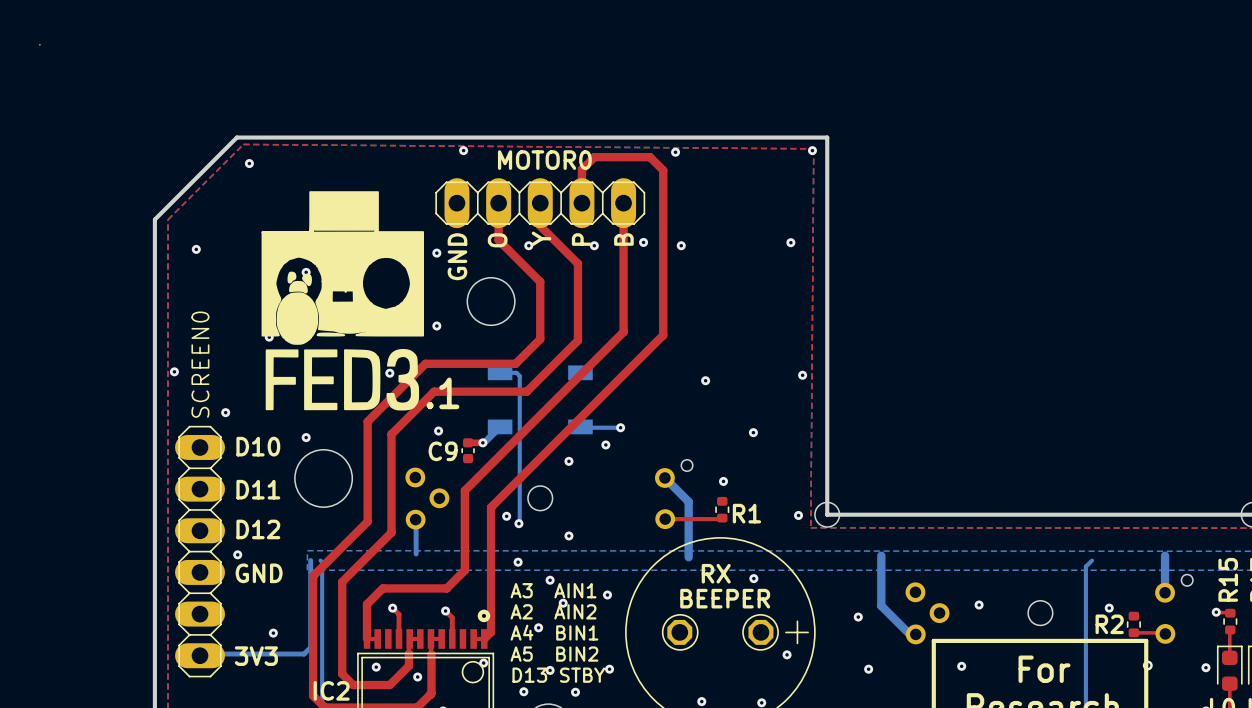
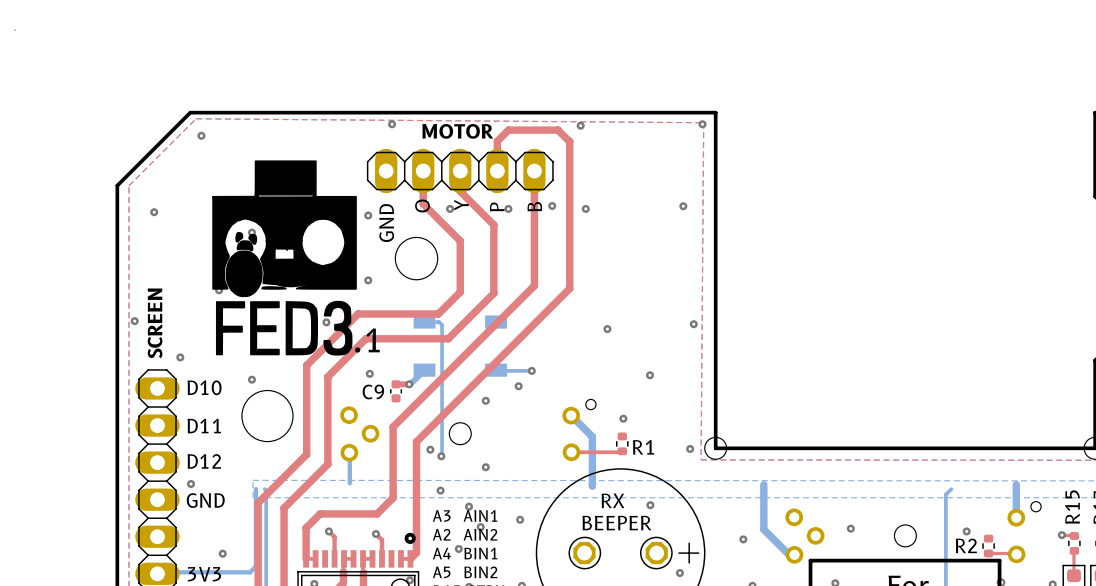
text: none -> MOTOR (457, 131)
MOTOR0 name: MOTOR0 (544, 160) -> none
text: none -> SCREEN (155, 323)
SCREEN0 name: SCREEN0 (200, 364) -> none

